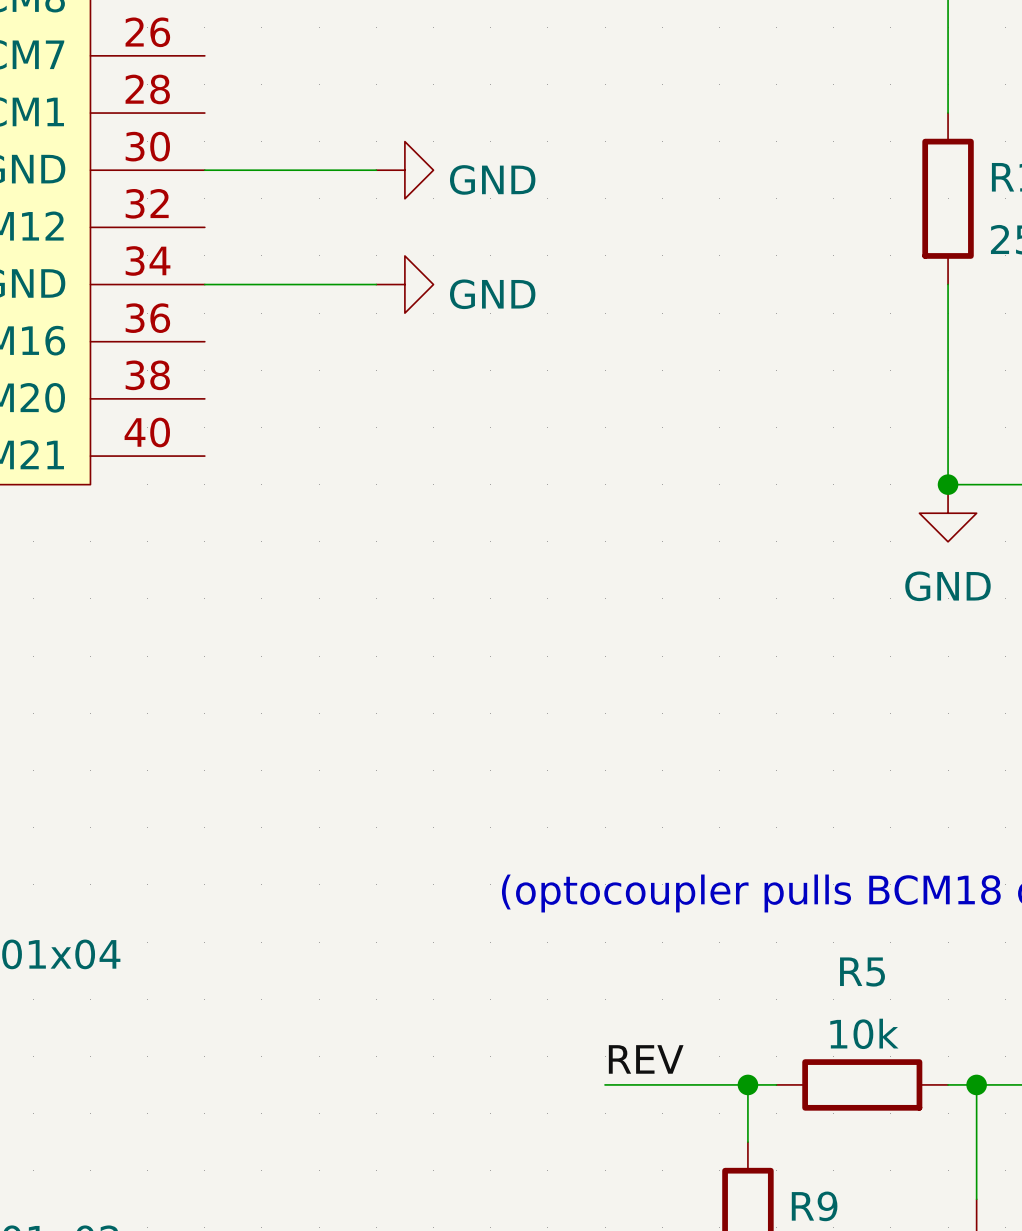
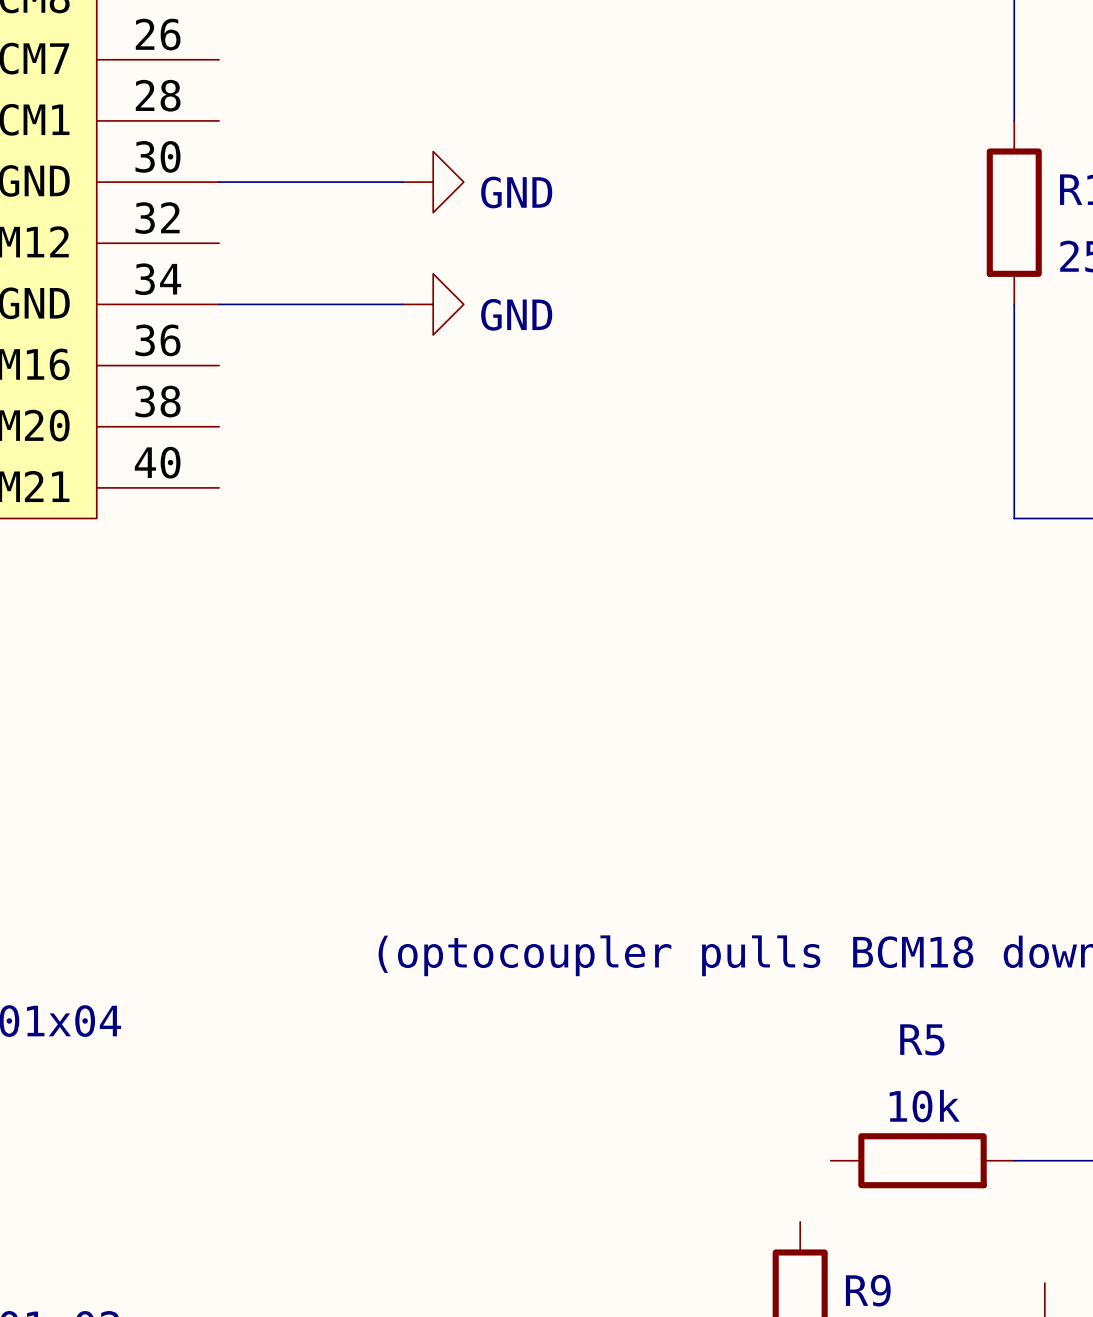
junction: (948, 484) -> none
power symbol: GND (948, 513) -> none
label: REV (646, 1059) -> none
wire: (605, 1084) (776, 1084) -> none
wire: (747, 1084) (747, 1142) -> none
junction: (747, 1084) -> none
wire: (976, 1084) (976, 1199) -> none
junction: (976, 1084) -> none

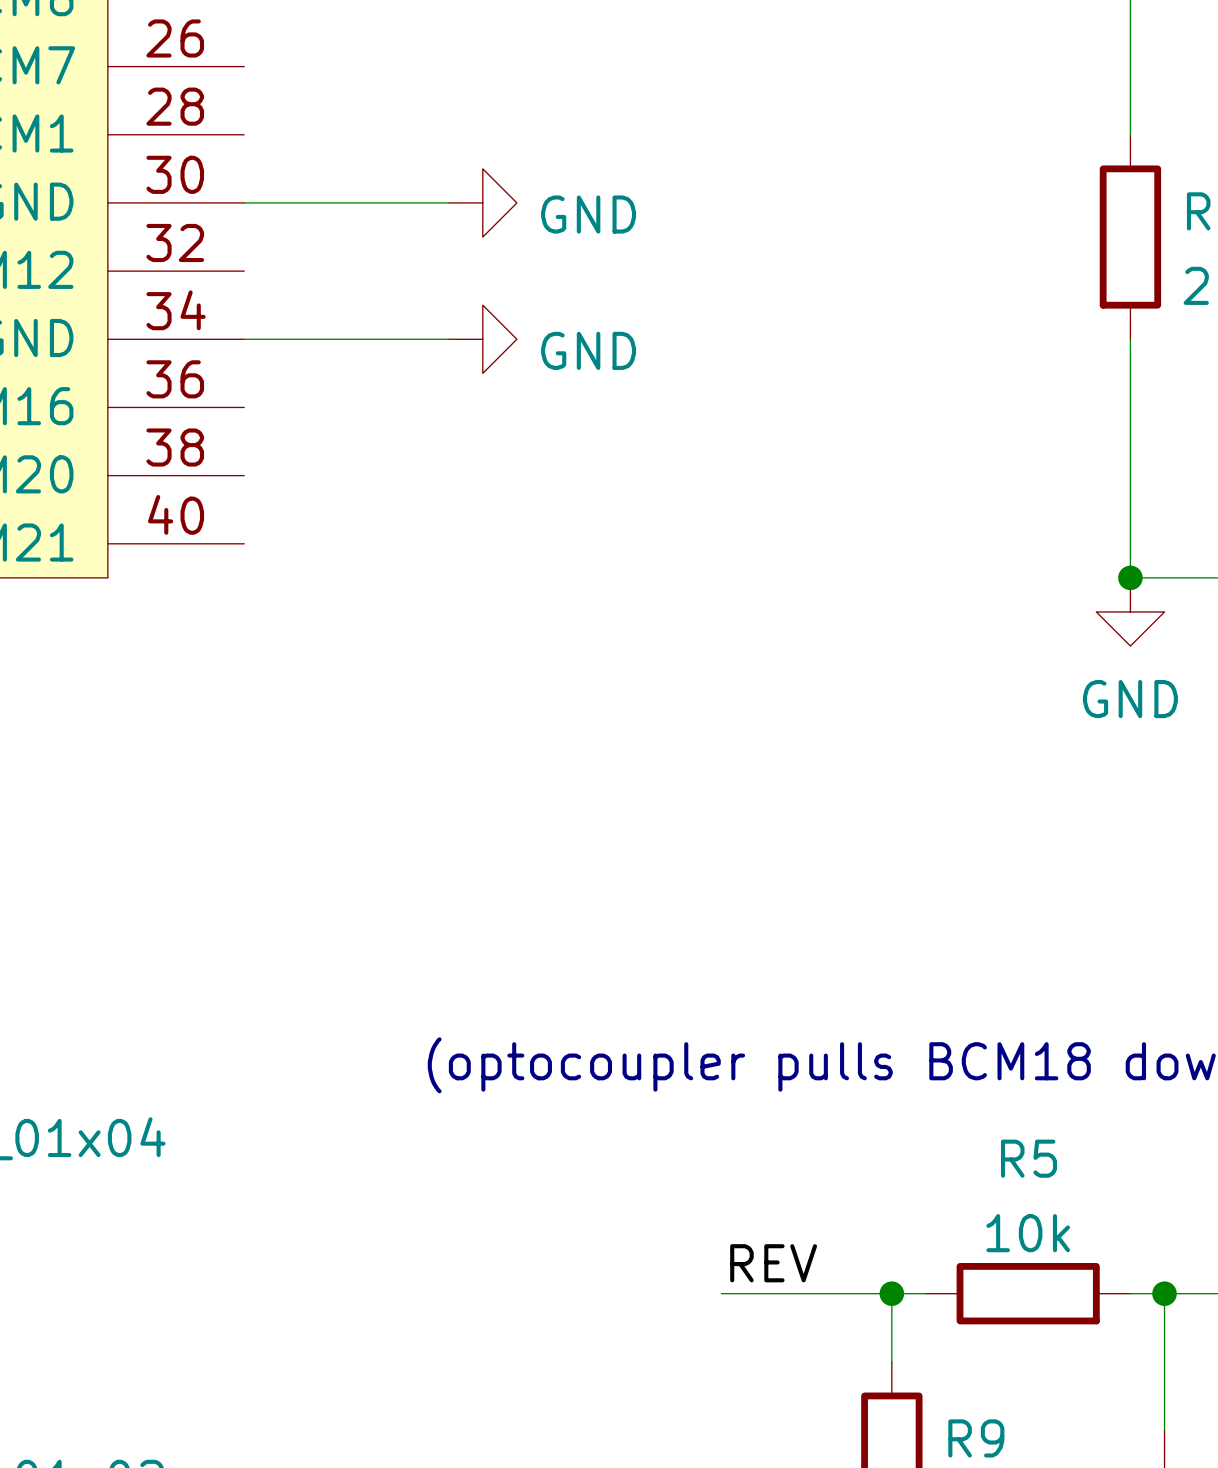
junction: none -> (1130, 577)
power symbol: none -> GND (1130, 611)
label: none -> REV (773, 1263)
wire: none -> (721, 1293) (925, 1293)
wire: none -> (891, 1293) (891, 1361)
junction: none -> (891, 1293)
wire: none -> (1164, 1293) (1164, 1430)
junction: none -> (1164, 1293)

